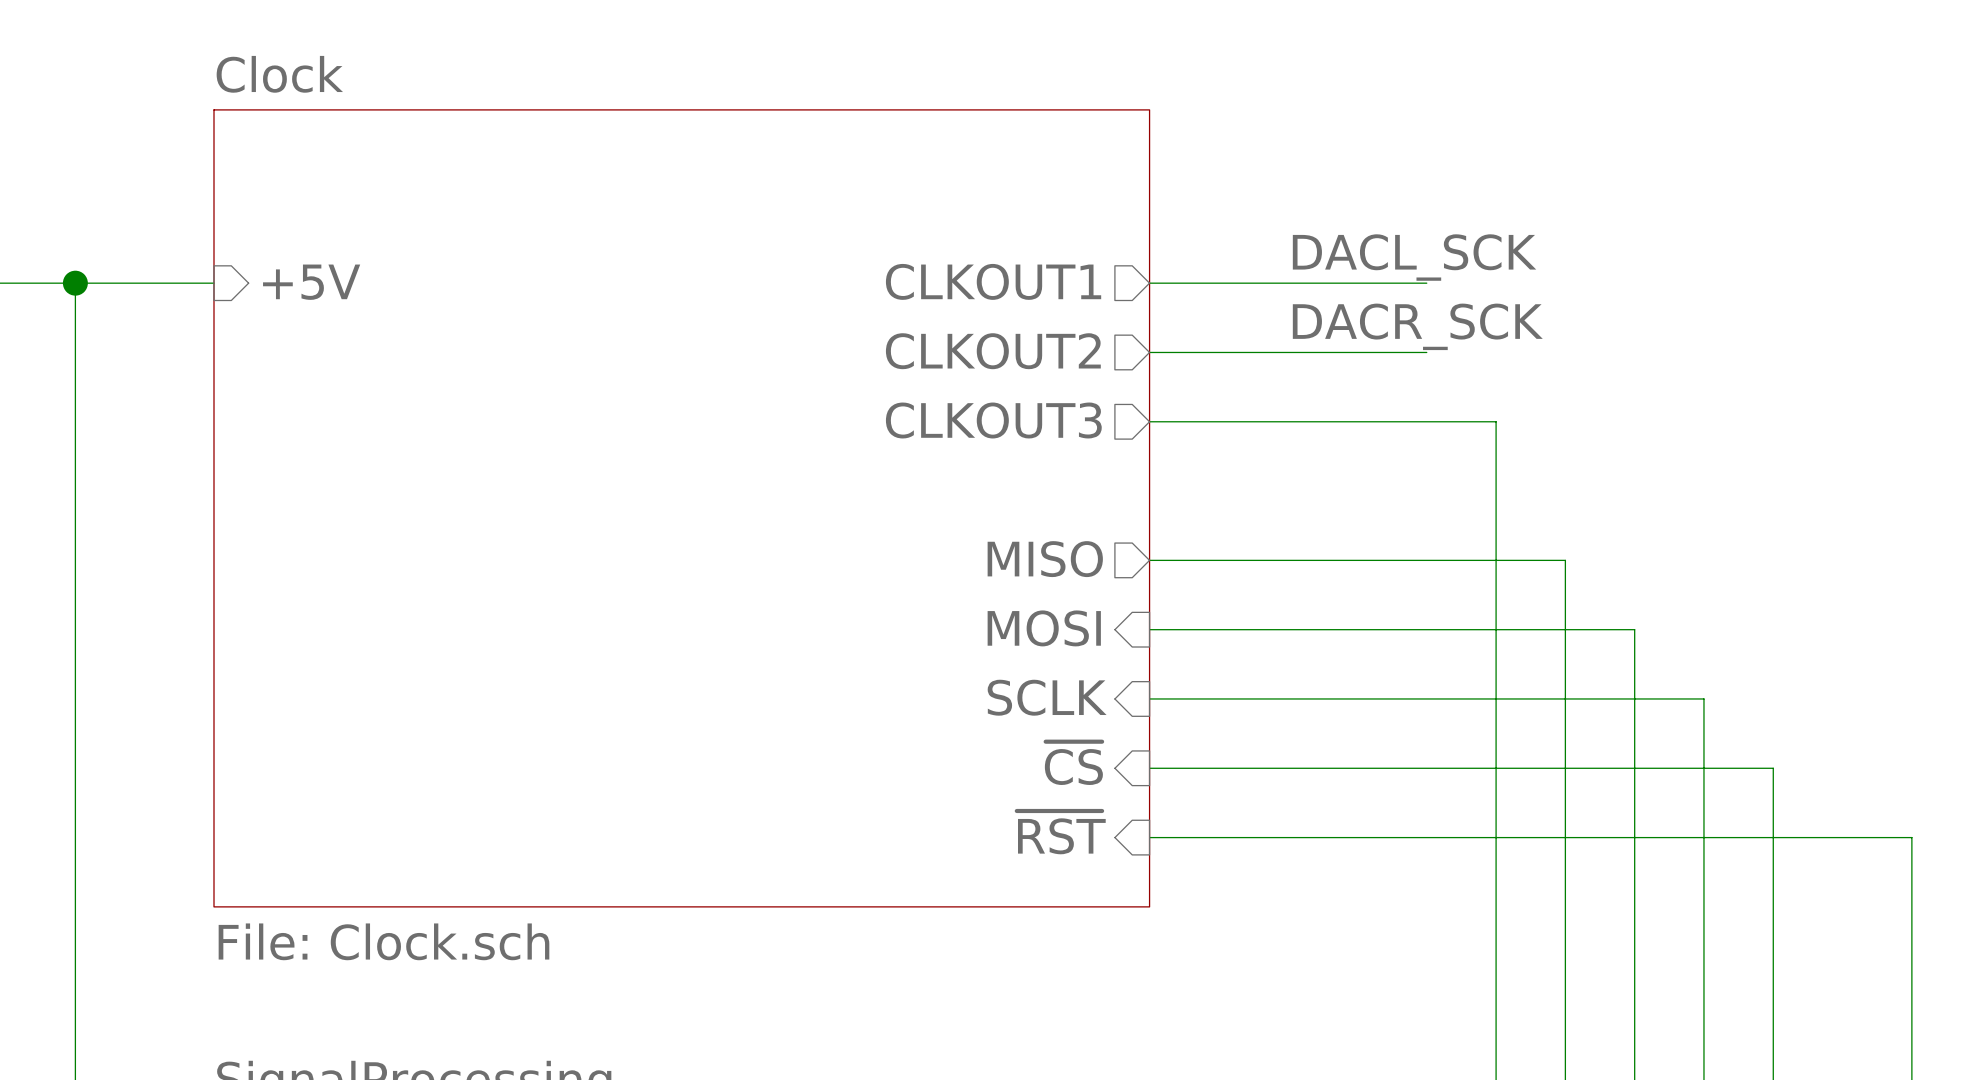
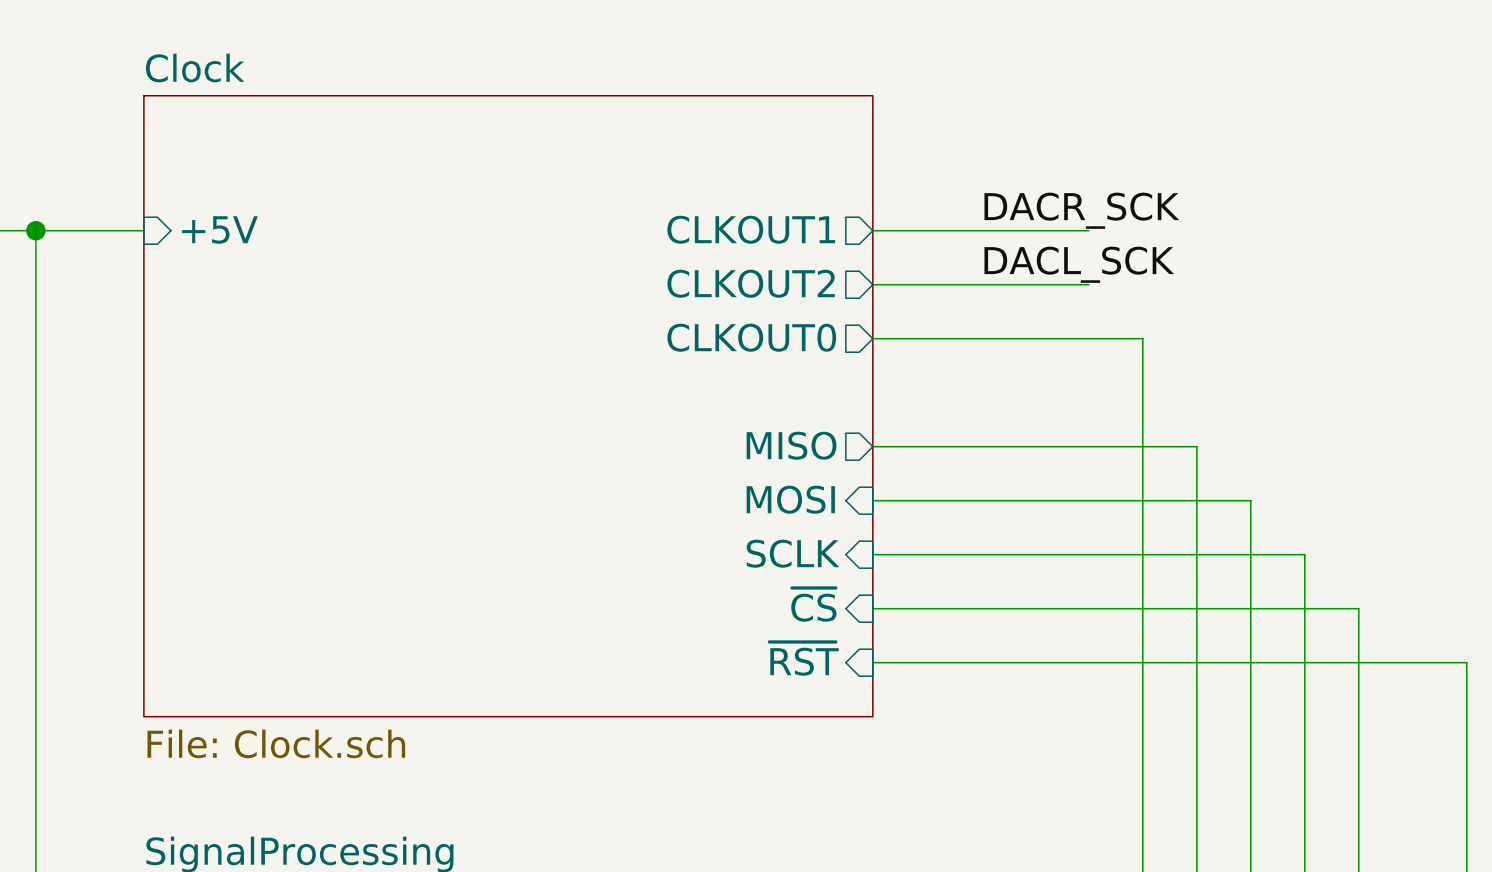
label: DACL_SCK (1414, 257) -> DACR_SCK (1081, 210)
label: DACR_SCK (1417, 326) -> DACL_SCK (1079, 264)
sheet pin: CLKOUT3 (993, 420) -> CLKOUT0 (751, 337)

